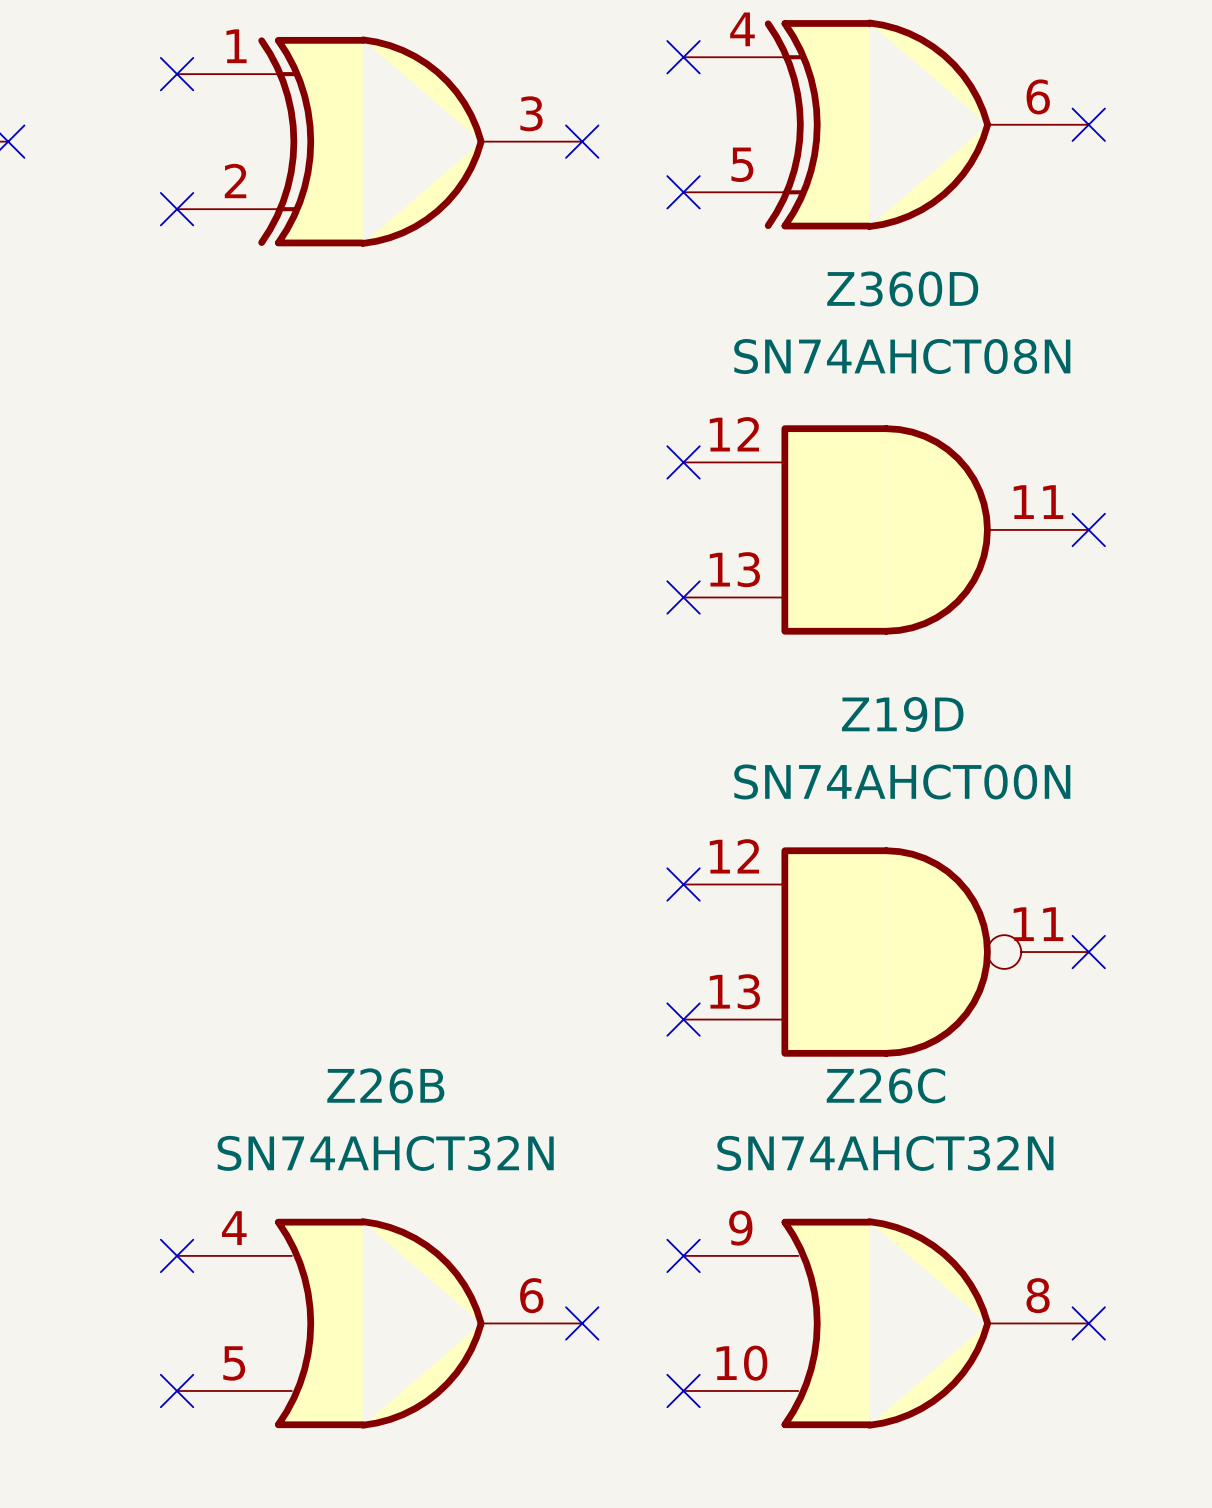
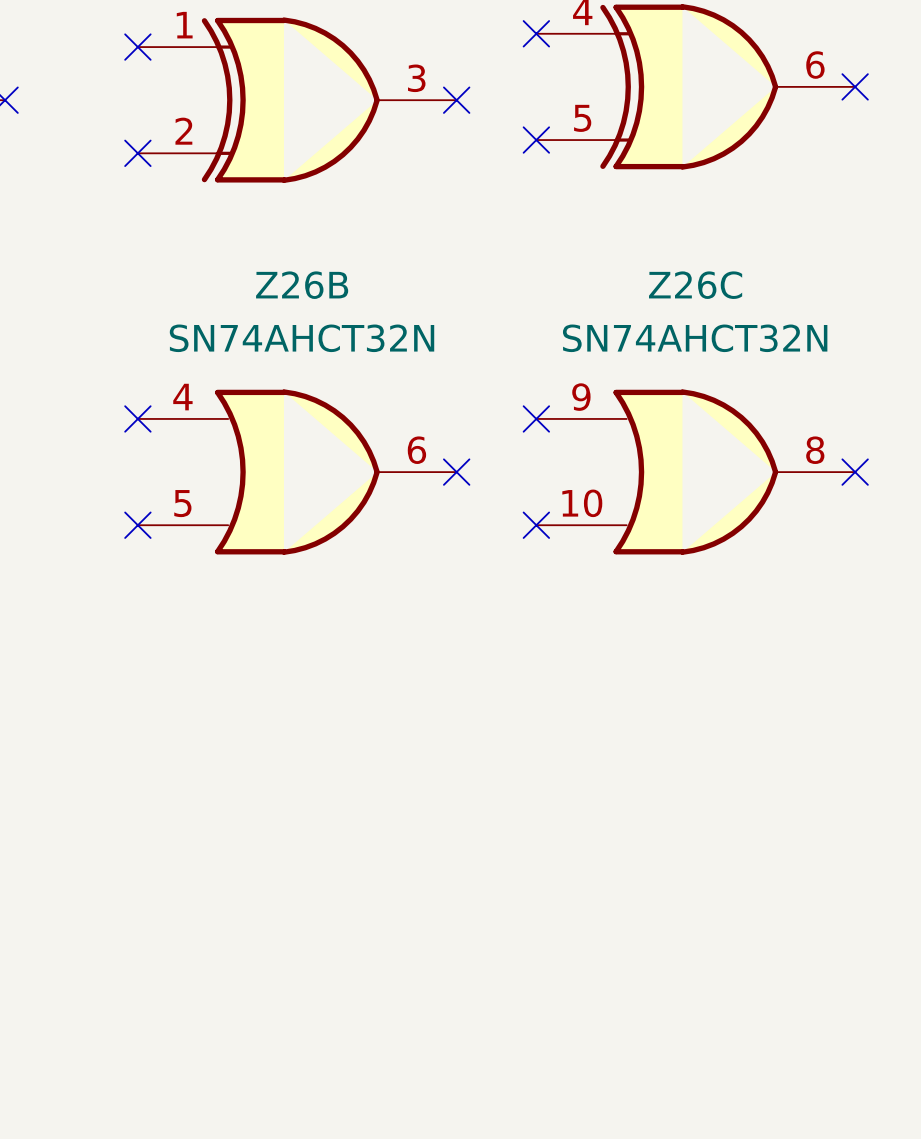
no-connect mark: (683, 462) -> none
Z360D: SN74AHCT08N (886, 529) -> none
no-connect mark position: (1088, 529) -> (855, 472)
no-connect mark: none -> (137, 418)
no-connect mark: none -> (536, 418)
no-connect mark: (683, 597) -> none
no-connect mark: none -> (456, 472)
no-connect mark: none -> (137, 525)
no-connect mark: none -> (536, 525)
no-connect mark: (683, 884) -> none
Z19D: SN74AHCT00N (886, 952) -> none
no-connect mark: (1088, 952) -> none
no-connect mark: (683, 1019) -> none
no-connect mark: (177, 1255) -> none
no-connect mark: (683, 1255) -> none
Z26B position: (379, 1323) -> (297, 472)
no-connect mark: (582, 1323) -> none
Z26C position: (886, 1323) -> (695, 472)
no-connect mark: (1088, 1323) -> none
no-connect mark: (177, 1390) -> none
no-connect mark: (683, 1390) -> none

